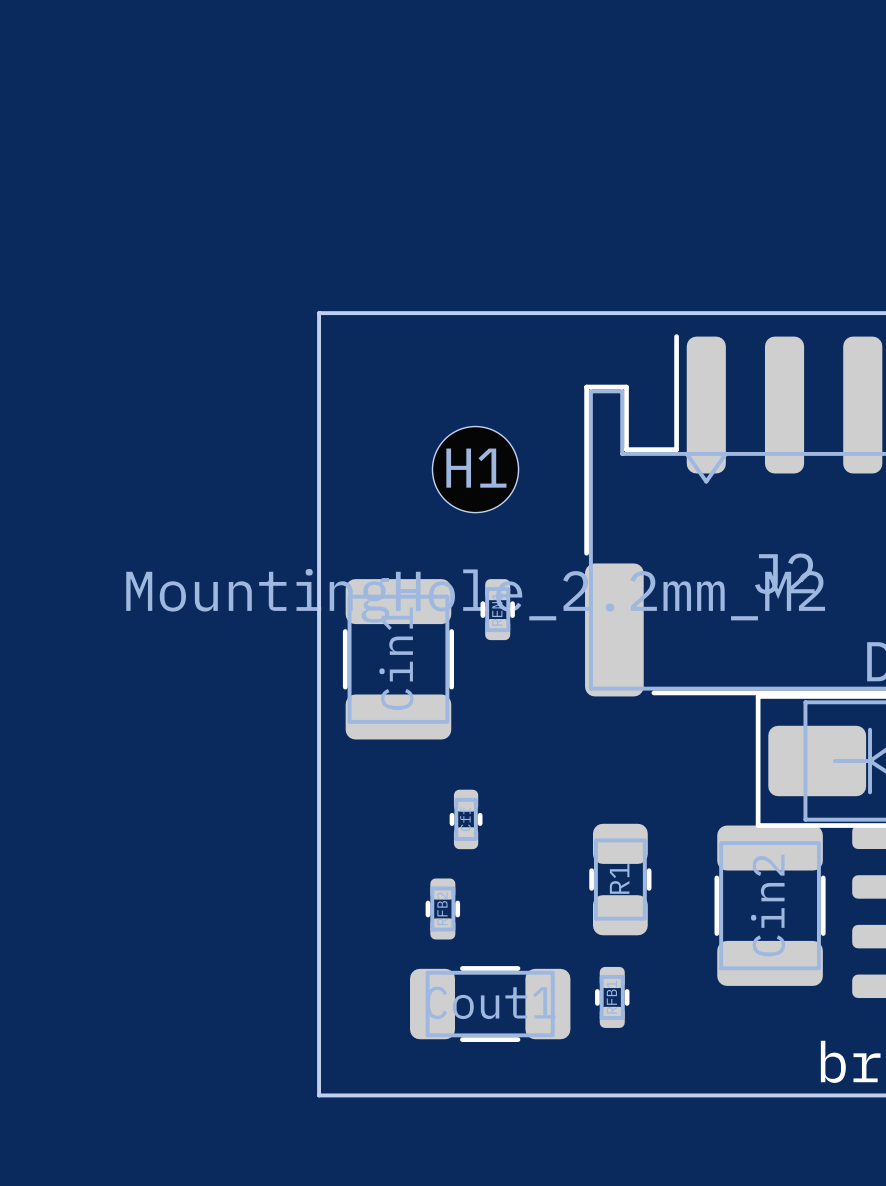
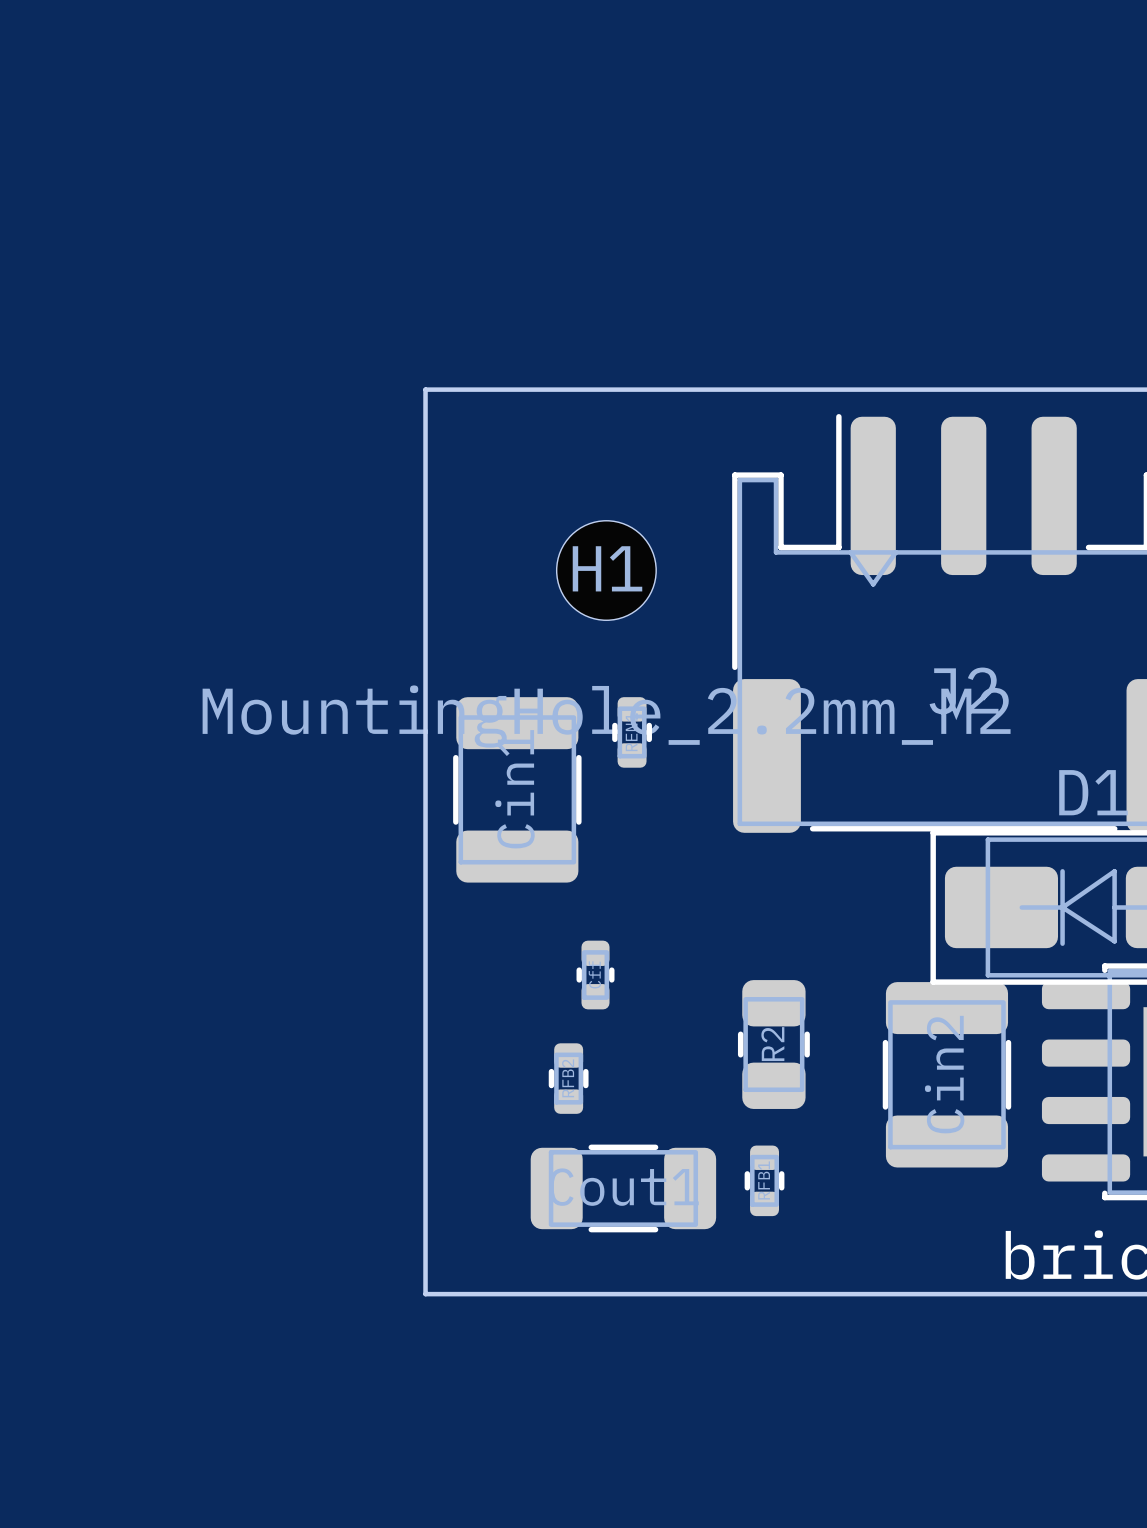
R1 name: R1 (619, 878) -> R2 (772, 1044)

